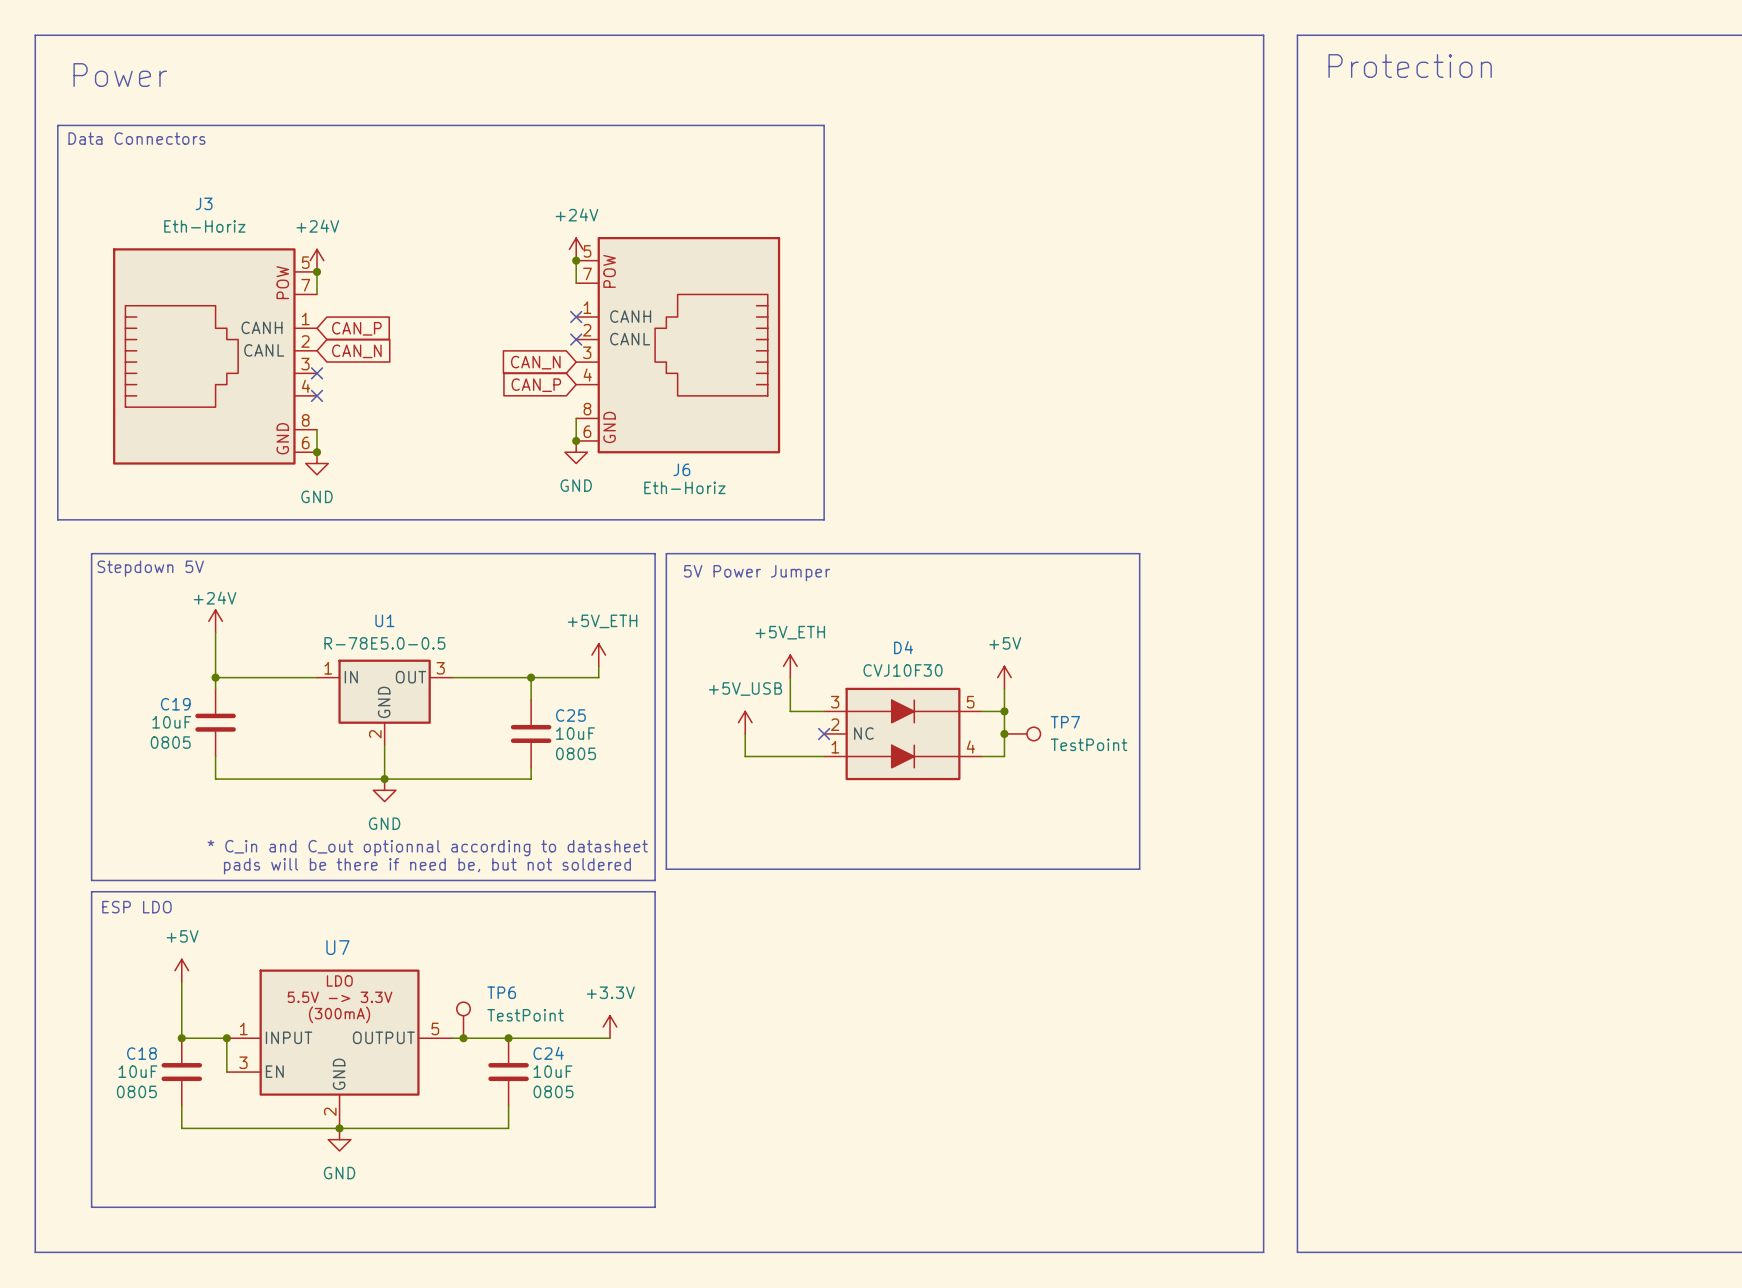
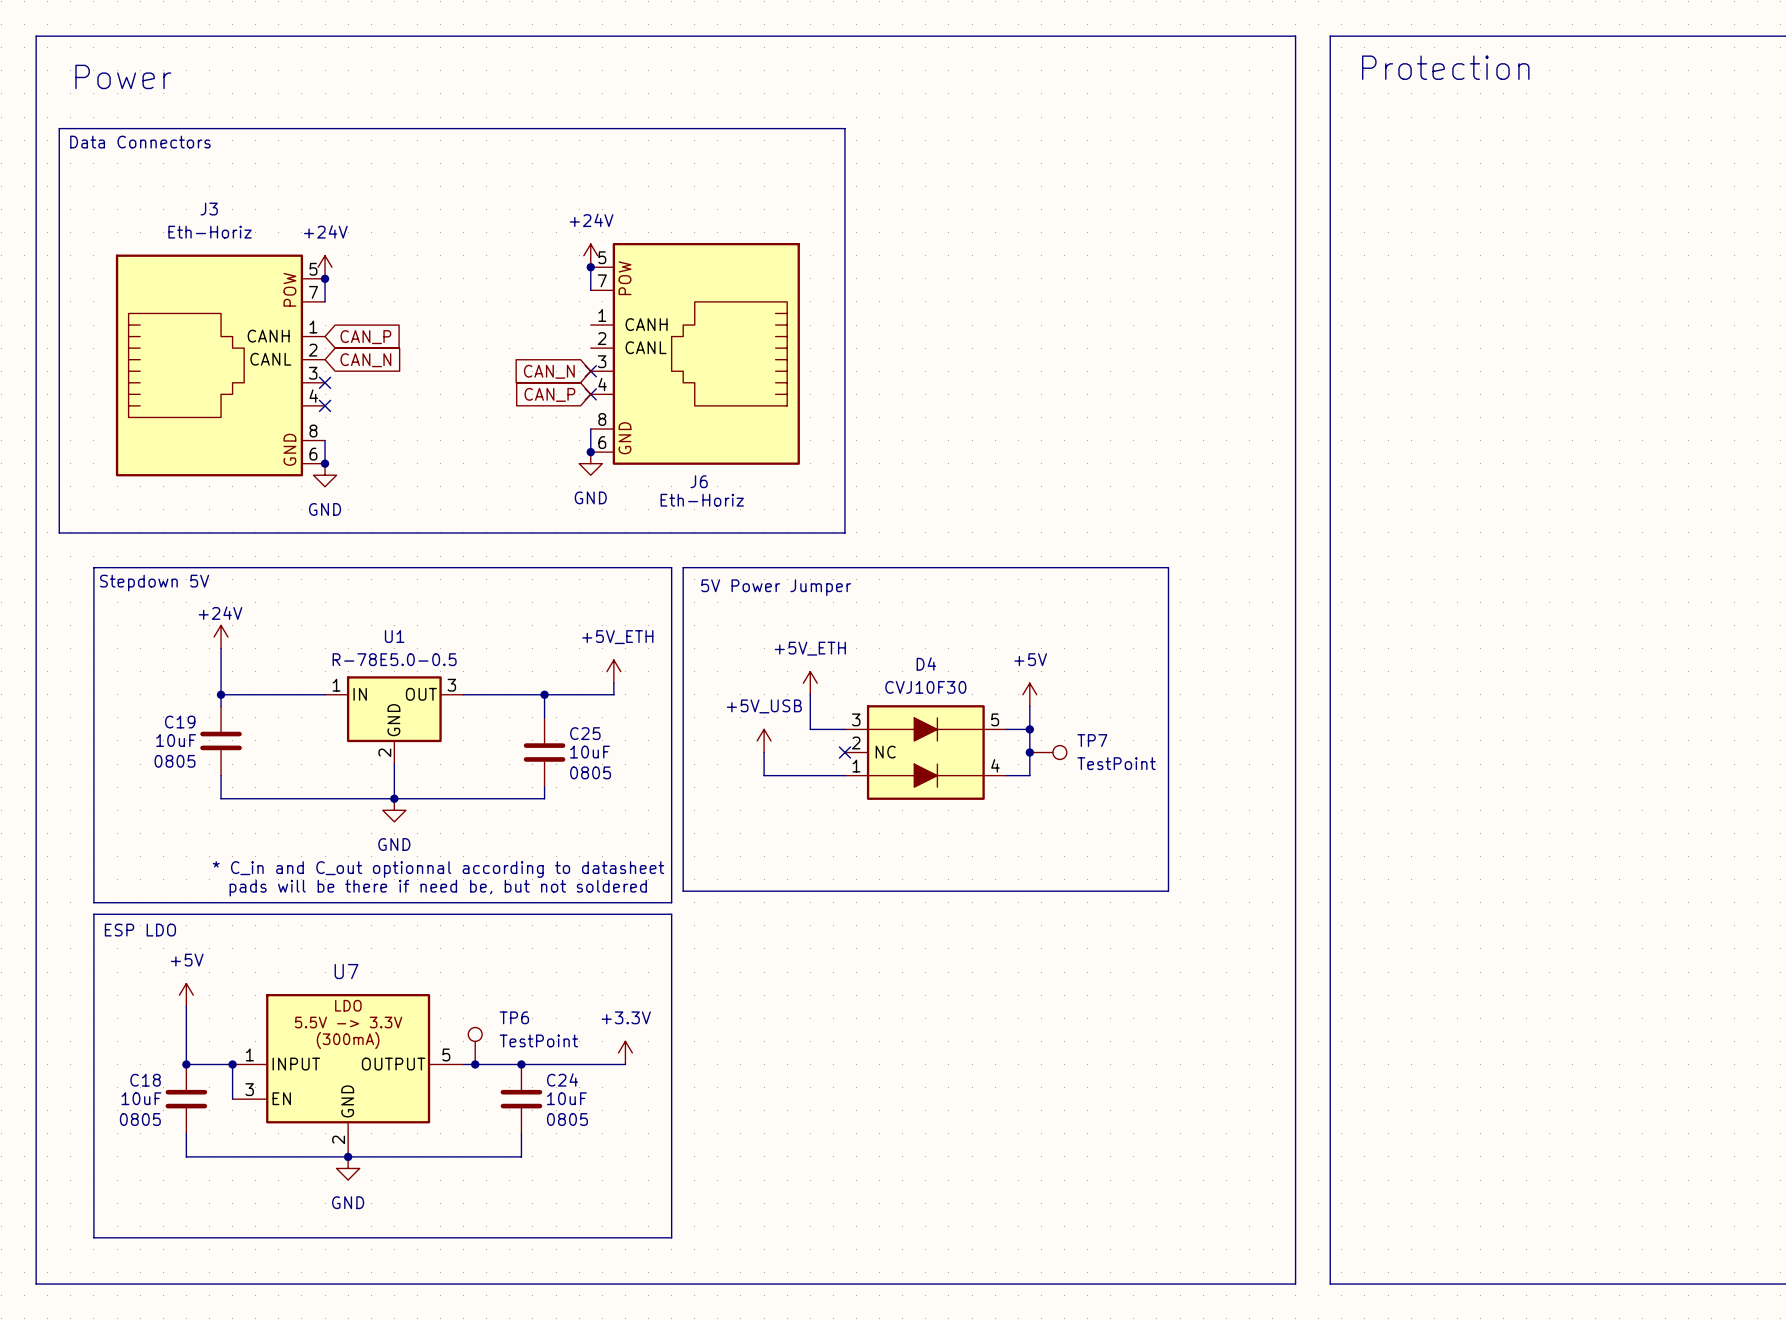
no-connect mark: (576, 317) -> none
no-connect mark: (576, 339) -> none
no-connect mark: none -> (590, 371)
no-connect mark: none -> (590, 394)

